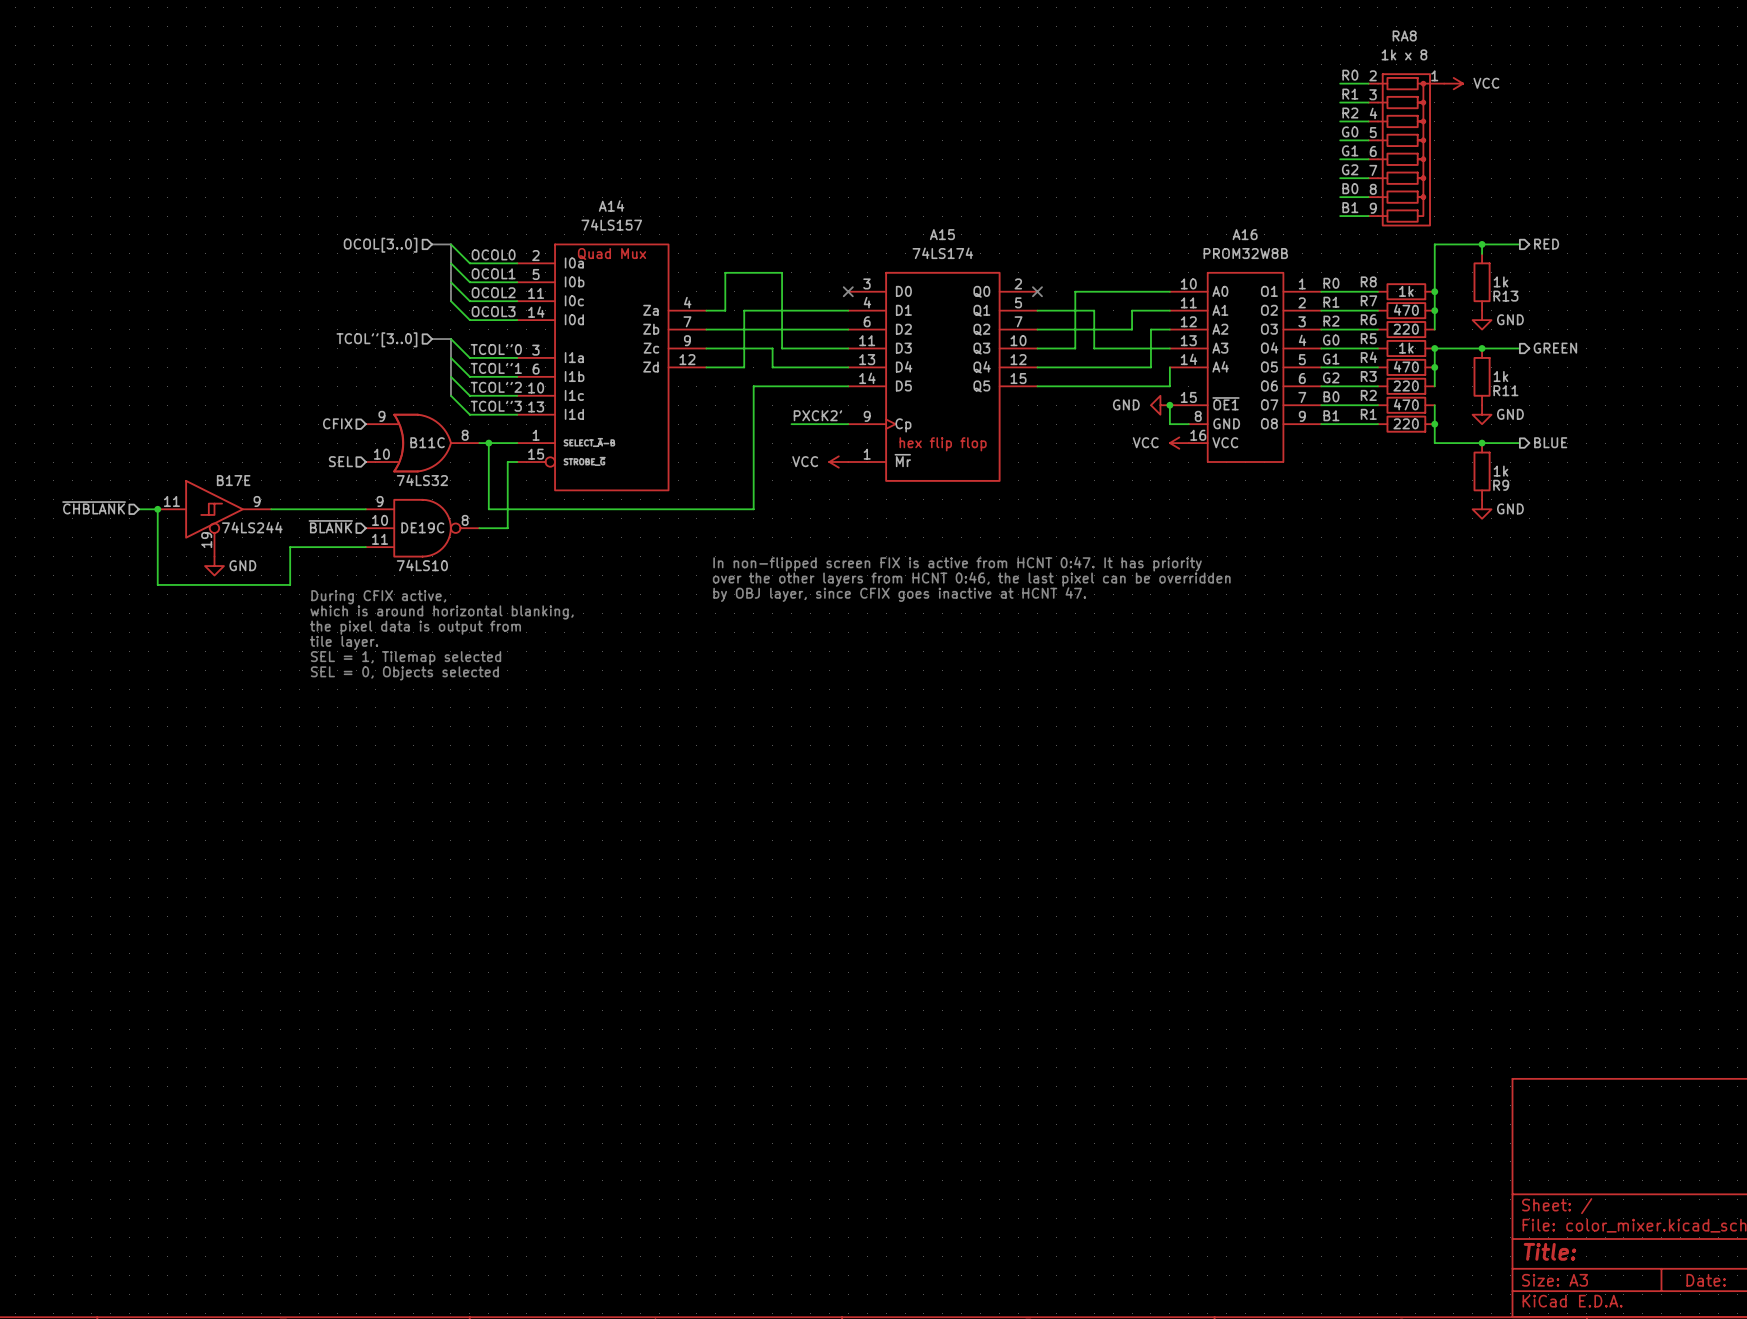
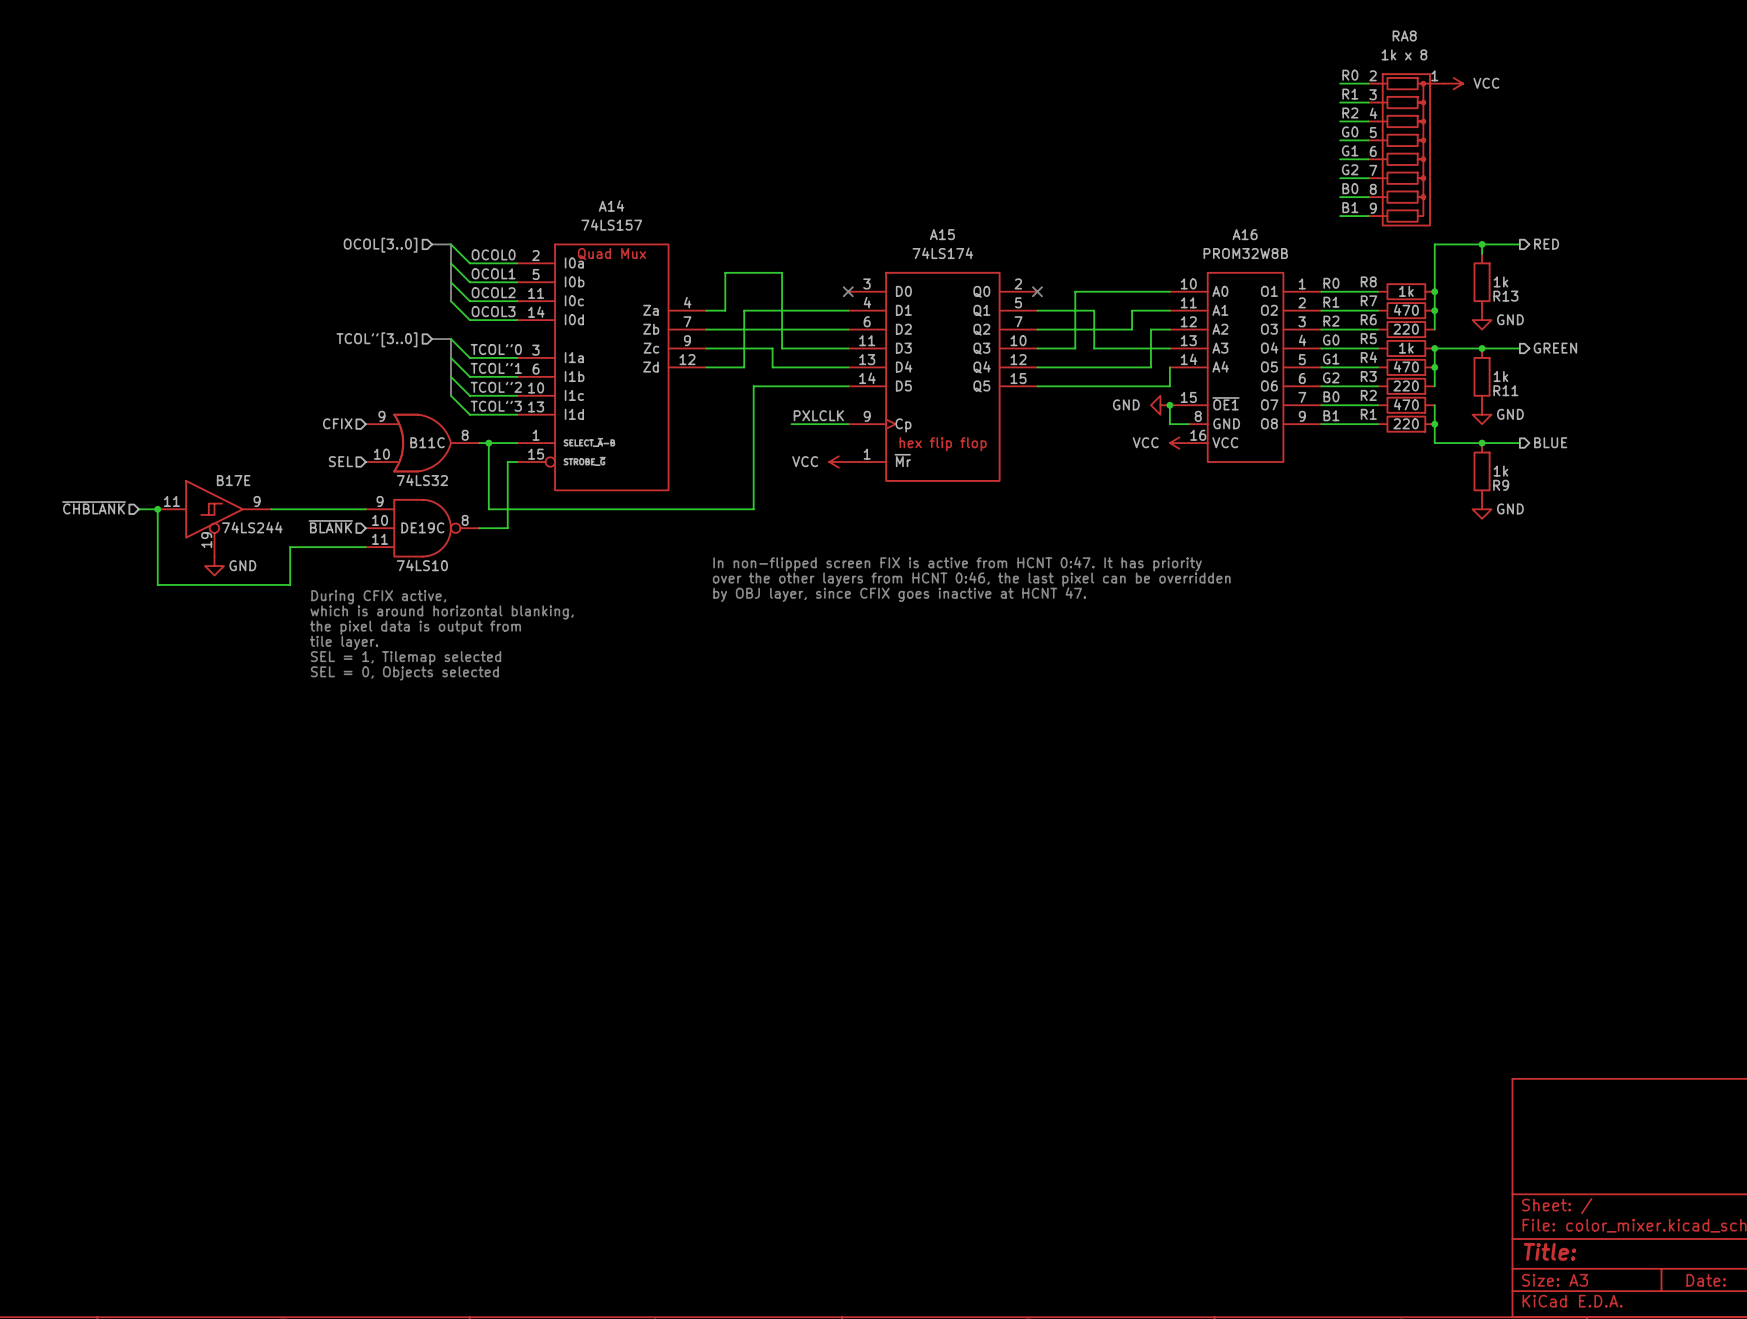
label: PXCK2' (817, 415) -> PXLCLK (818, 415)

